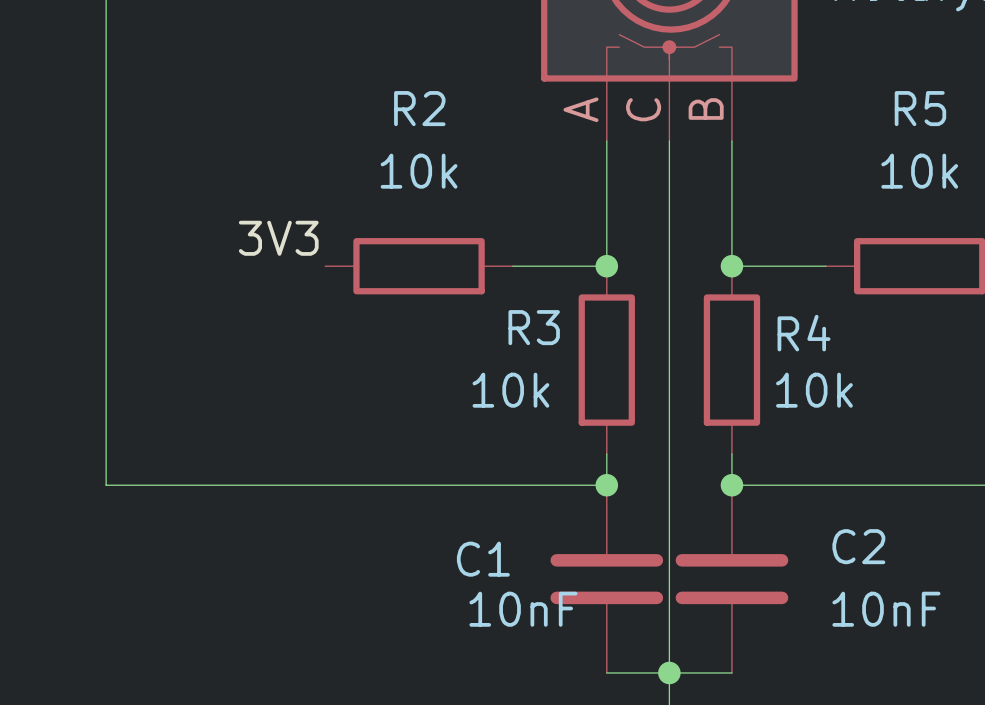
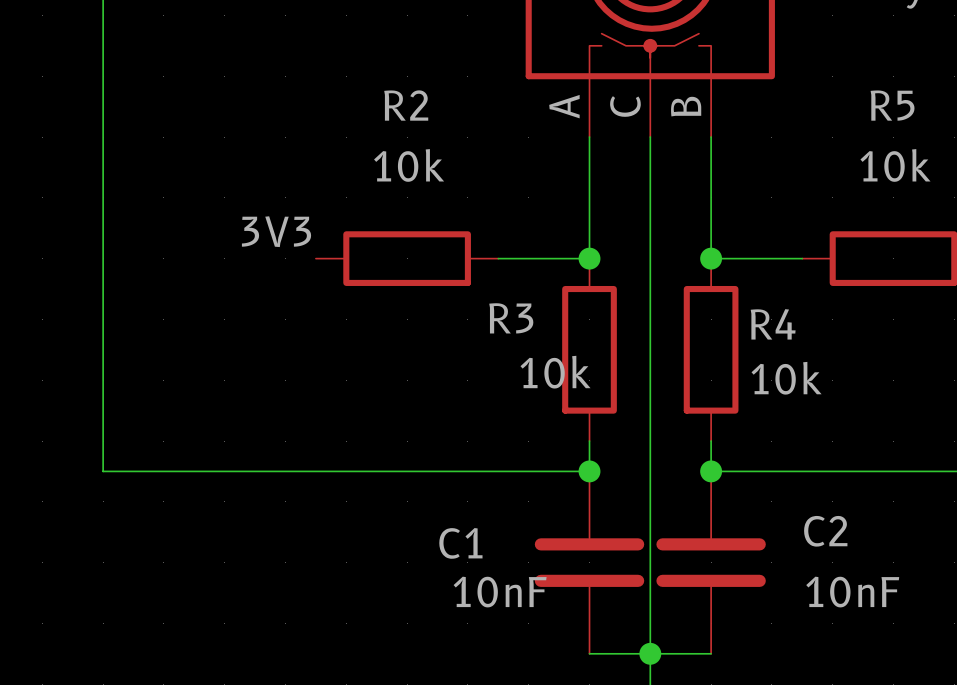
R3 value position: 10k (510, 390) -> 10k (555, 372)

